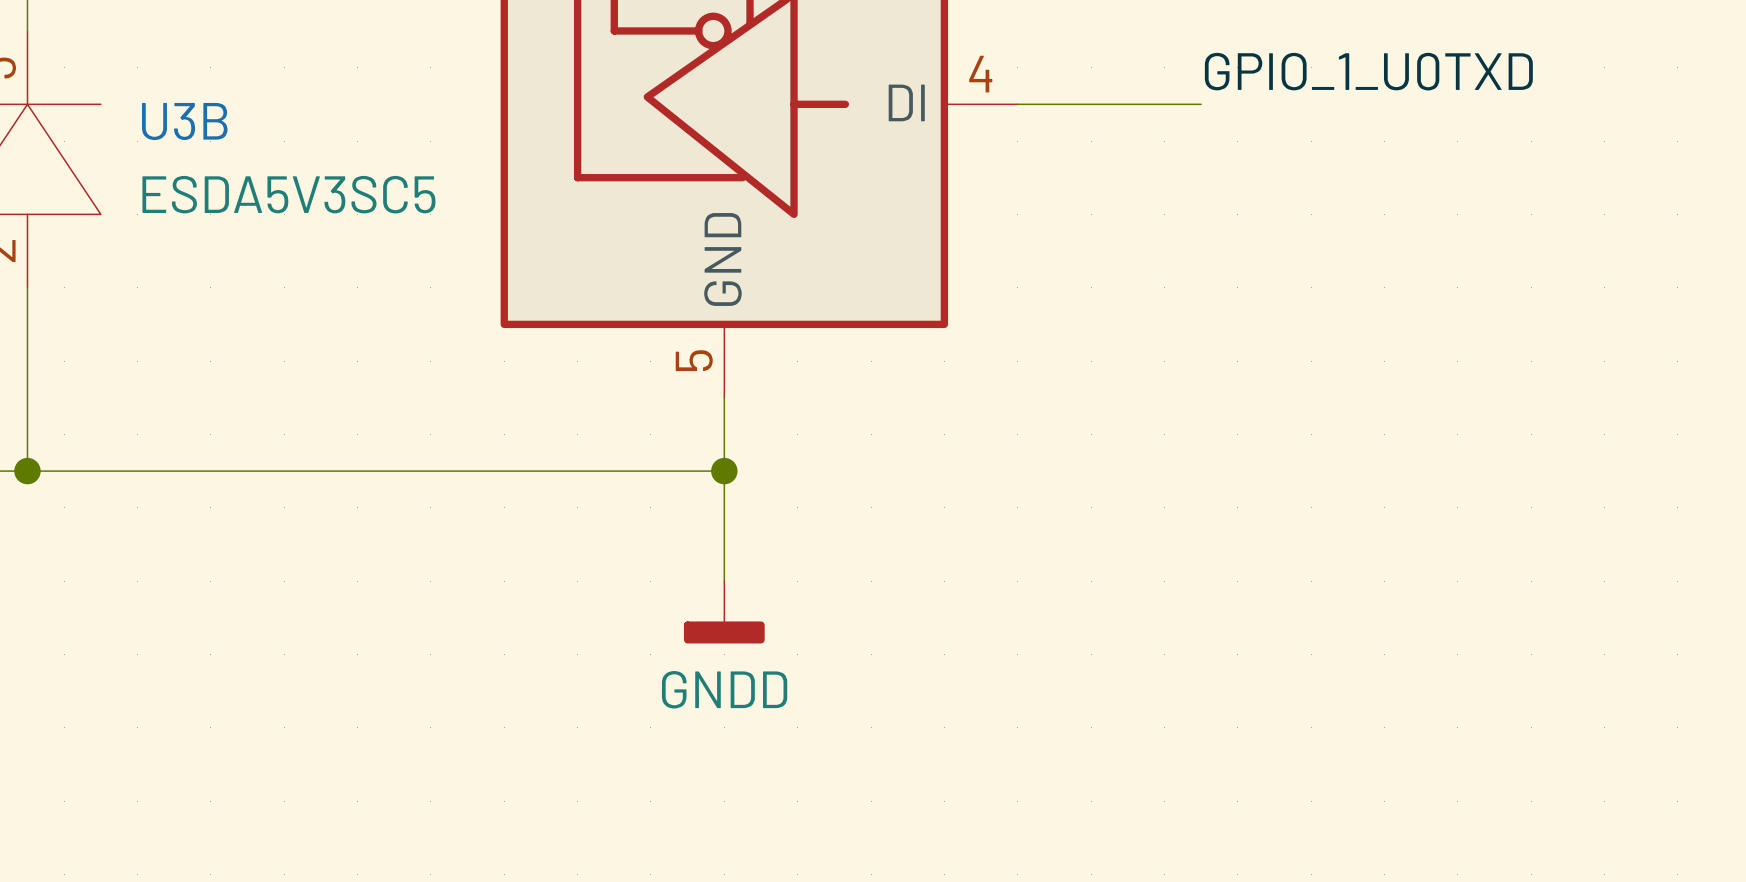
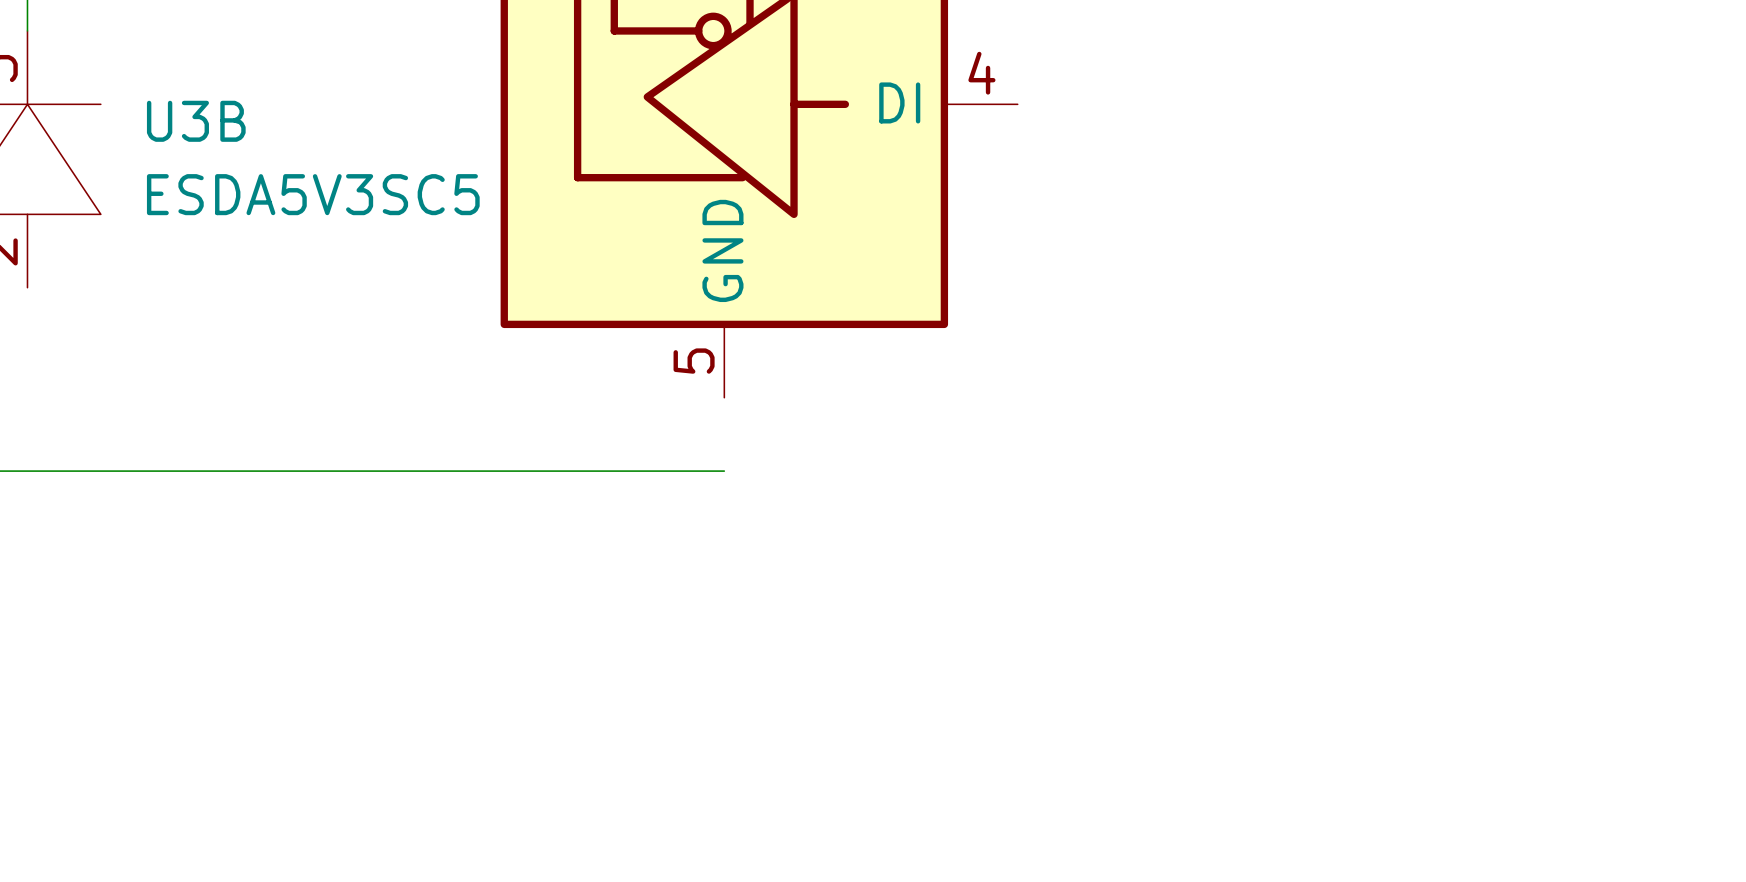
label: GPIO_1_U0TXD (1368, 71) -> none
wire: (1017, 104) (1201, 104) -> none
wire: (27, 287) (27, 471) -> none
wire: (724, 397) (724, 581) -> none
junction: (27, 471) -> none
junction: (724, 471) -> none
power symbol: GNDD (724, 612) -> none

